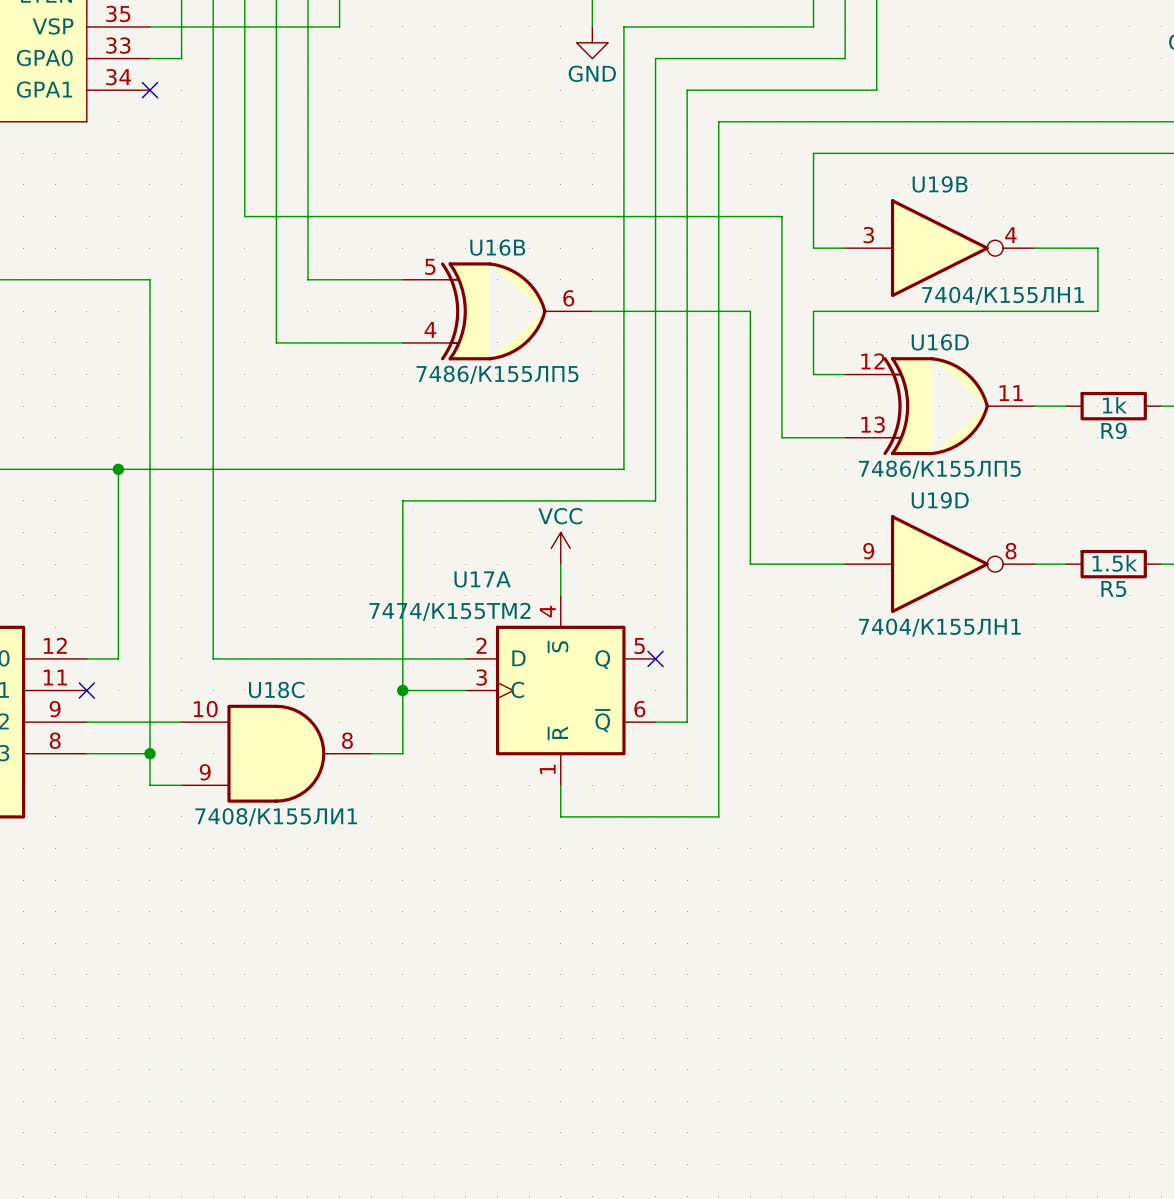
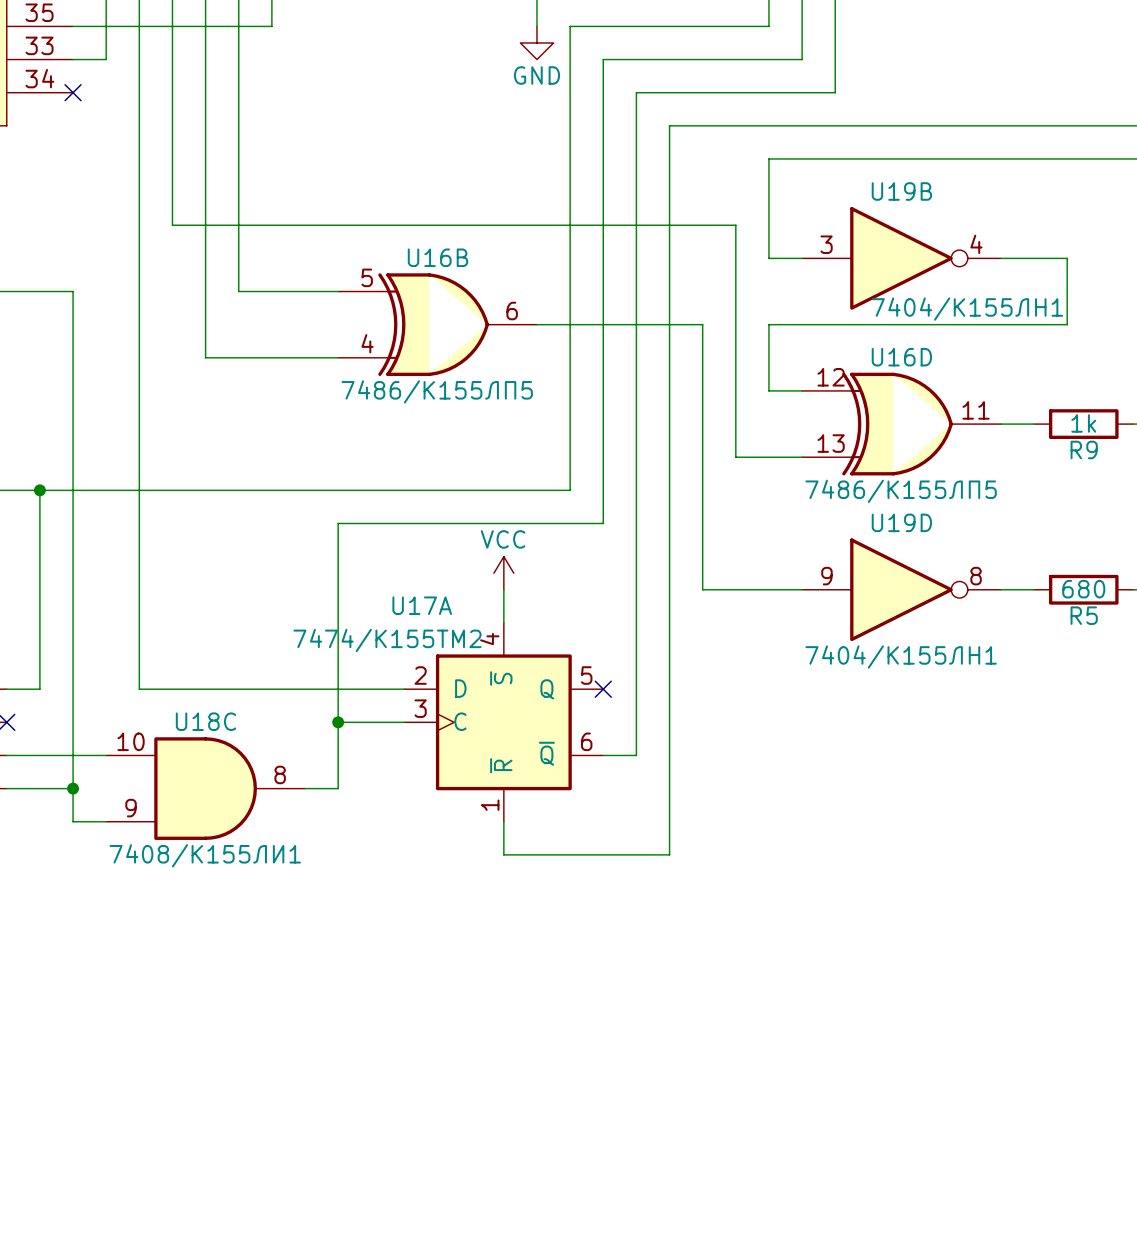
R5 value: 1.5k (1114, 563) -> 680 (1083, 589)

